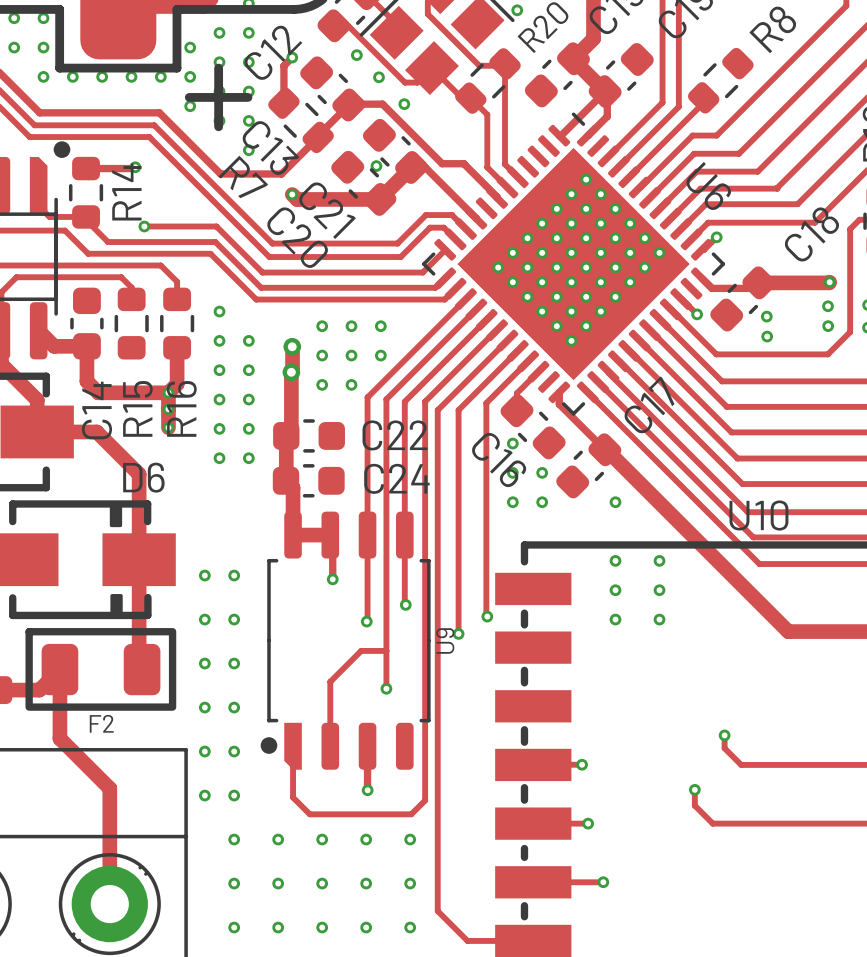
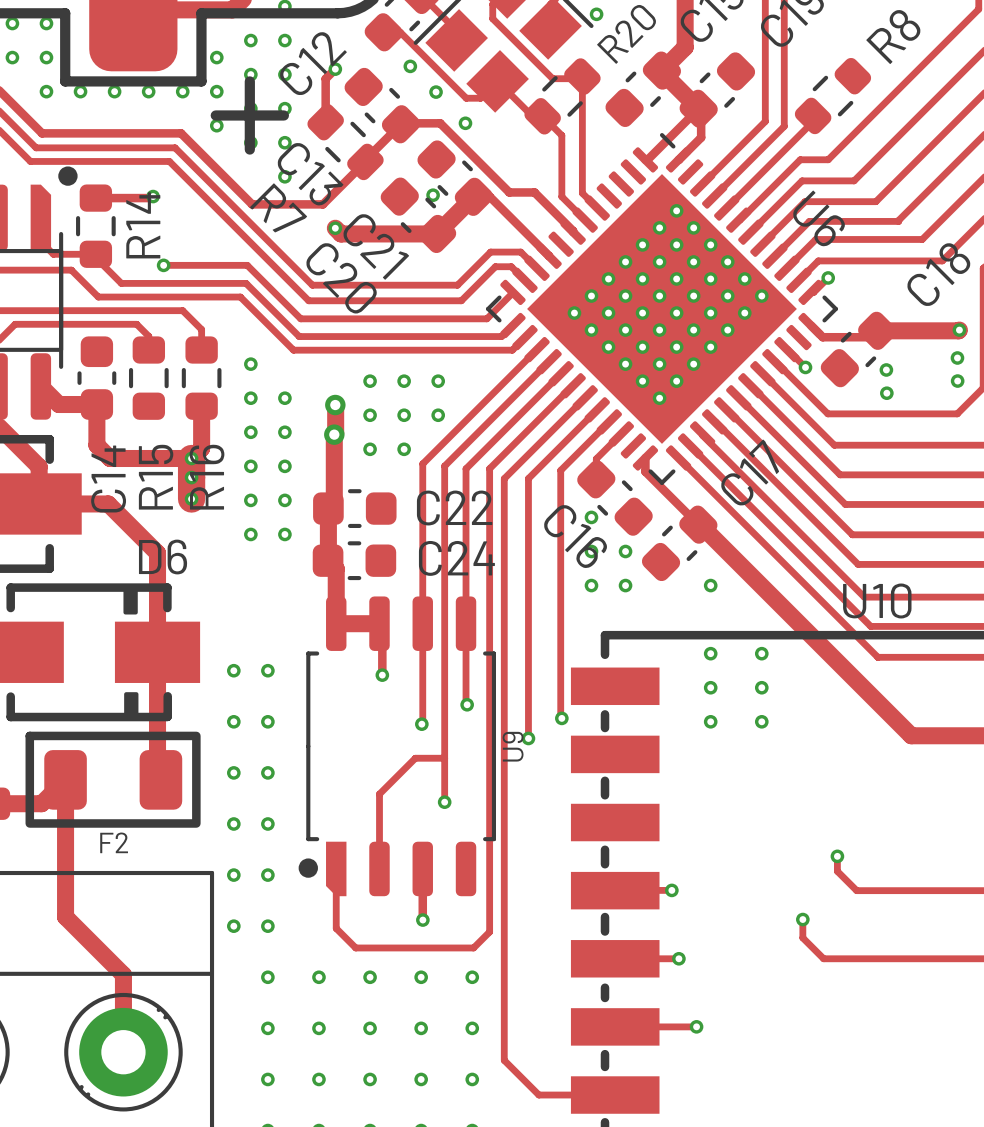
track width: thin (168, 392) (168, 427) -> thick (191, 458) (191, 499)
track: (59, 738) (109, 788) (109, 837) -> (65, 860) (65, 916) (123, 974)

